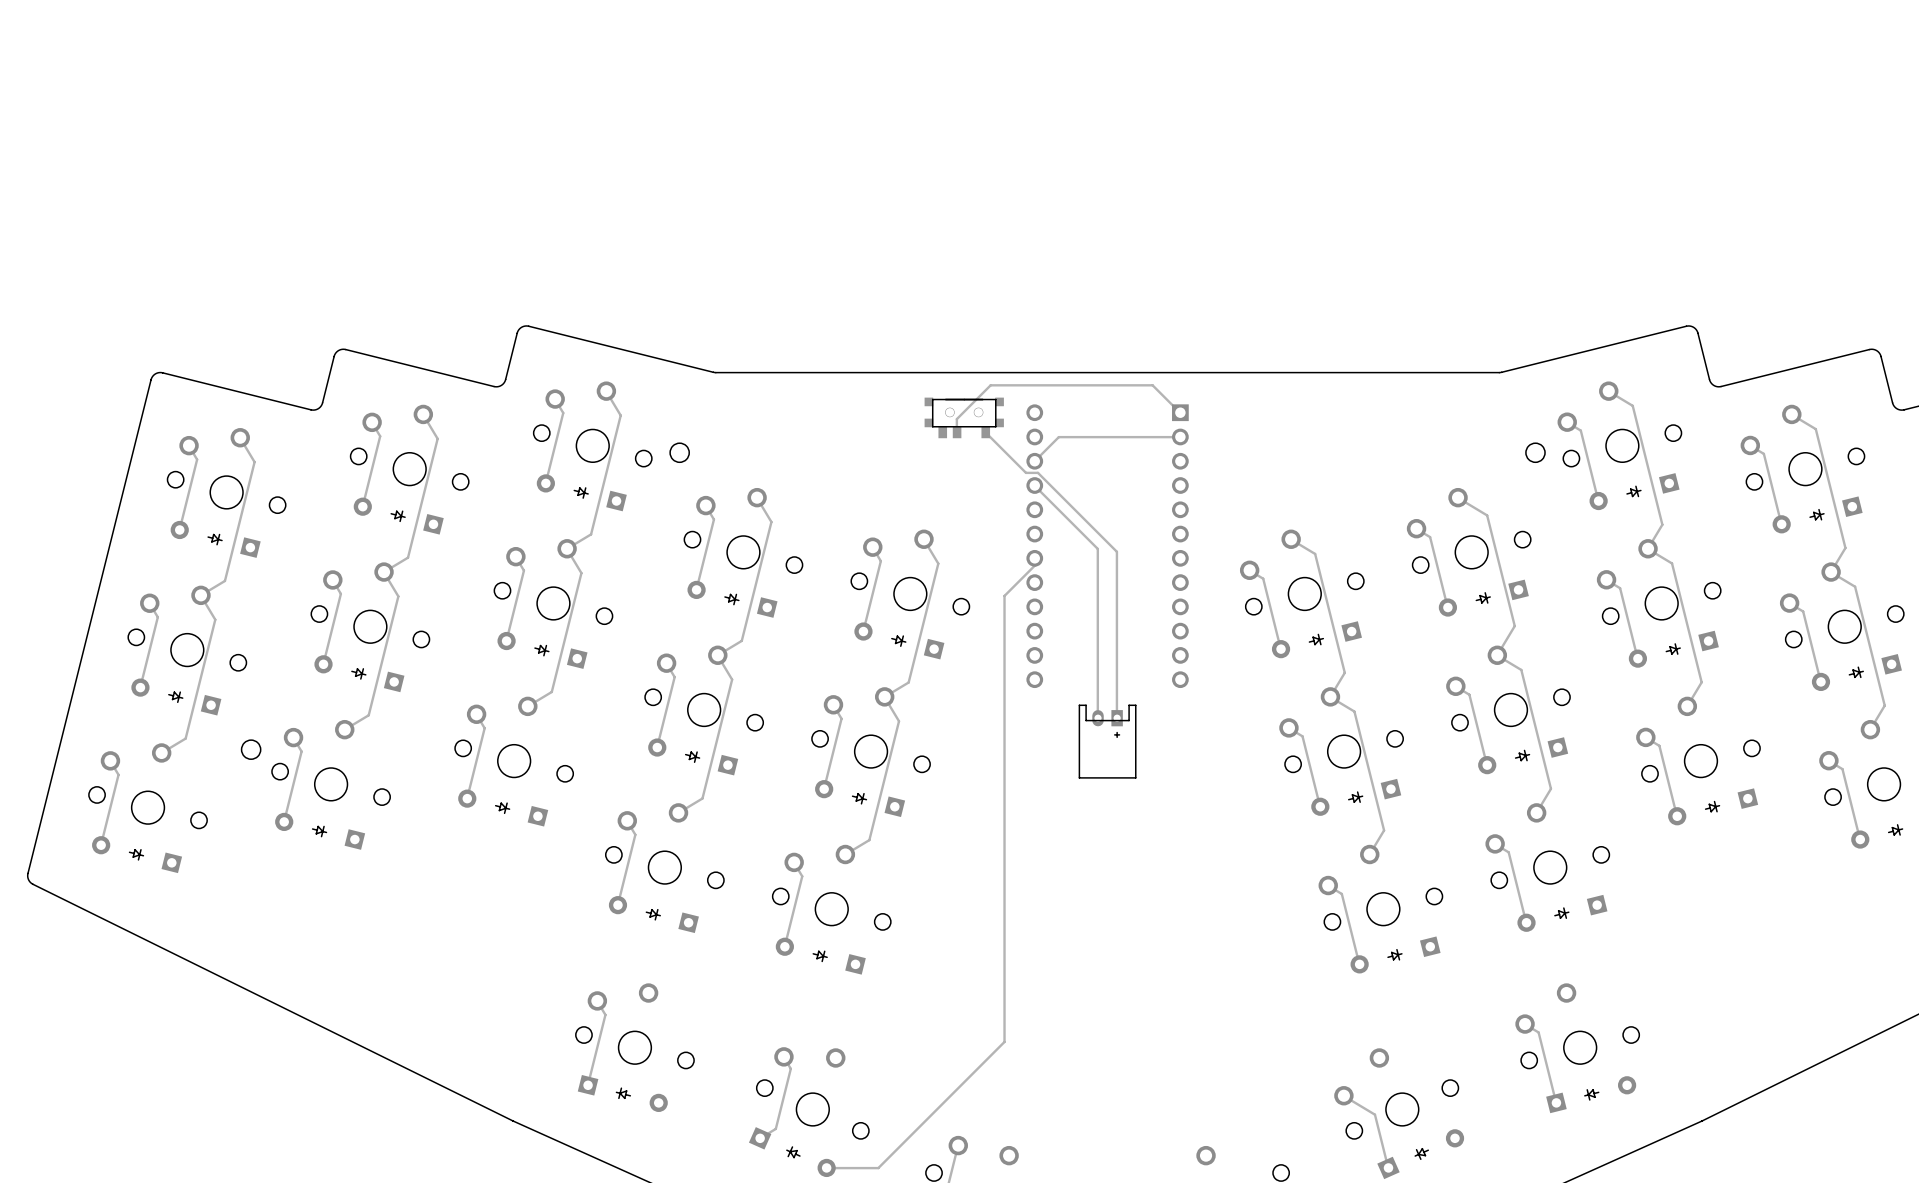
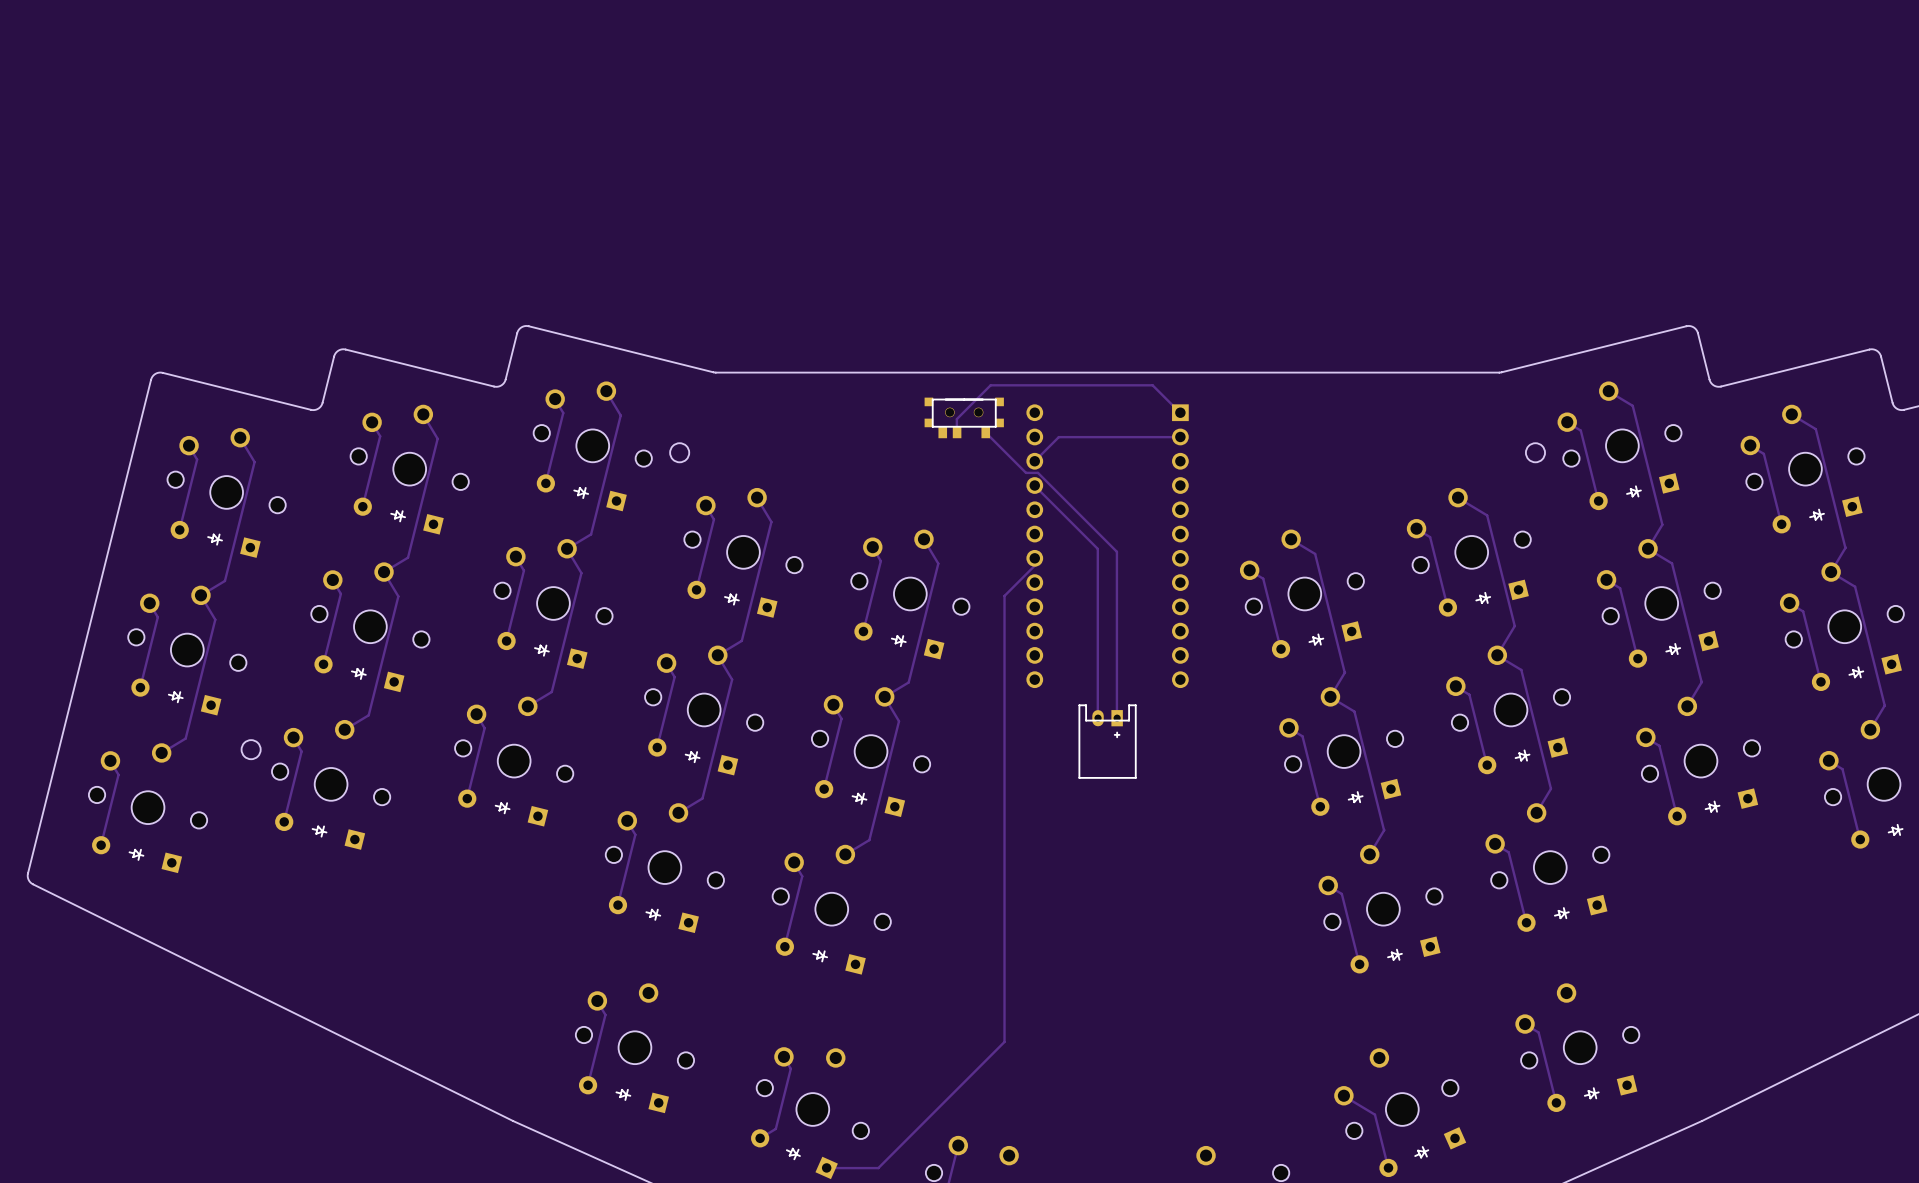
part rotation: 0° (622, 1093) -> 180° (623, 1094)
part rotation: 0° (1591, 1094) -> 180° (1592, 1093)
part rotation: 0° (792, 1152) -> 180° (794, 1154)
part rotation: 0° (1420, 1154) -> 180° (1422, 1152)

